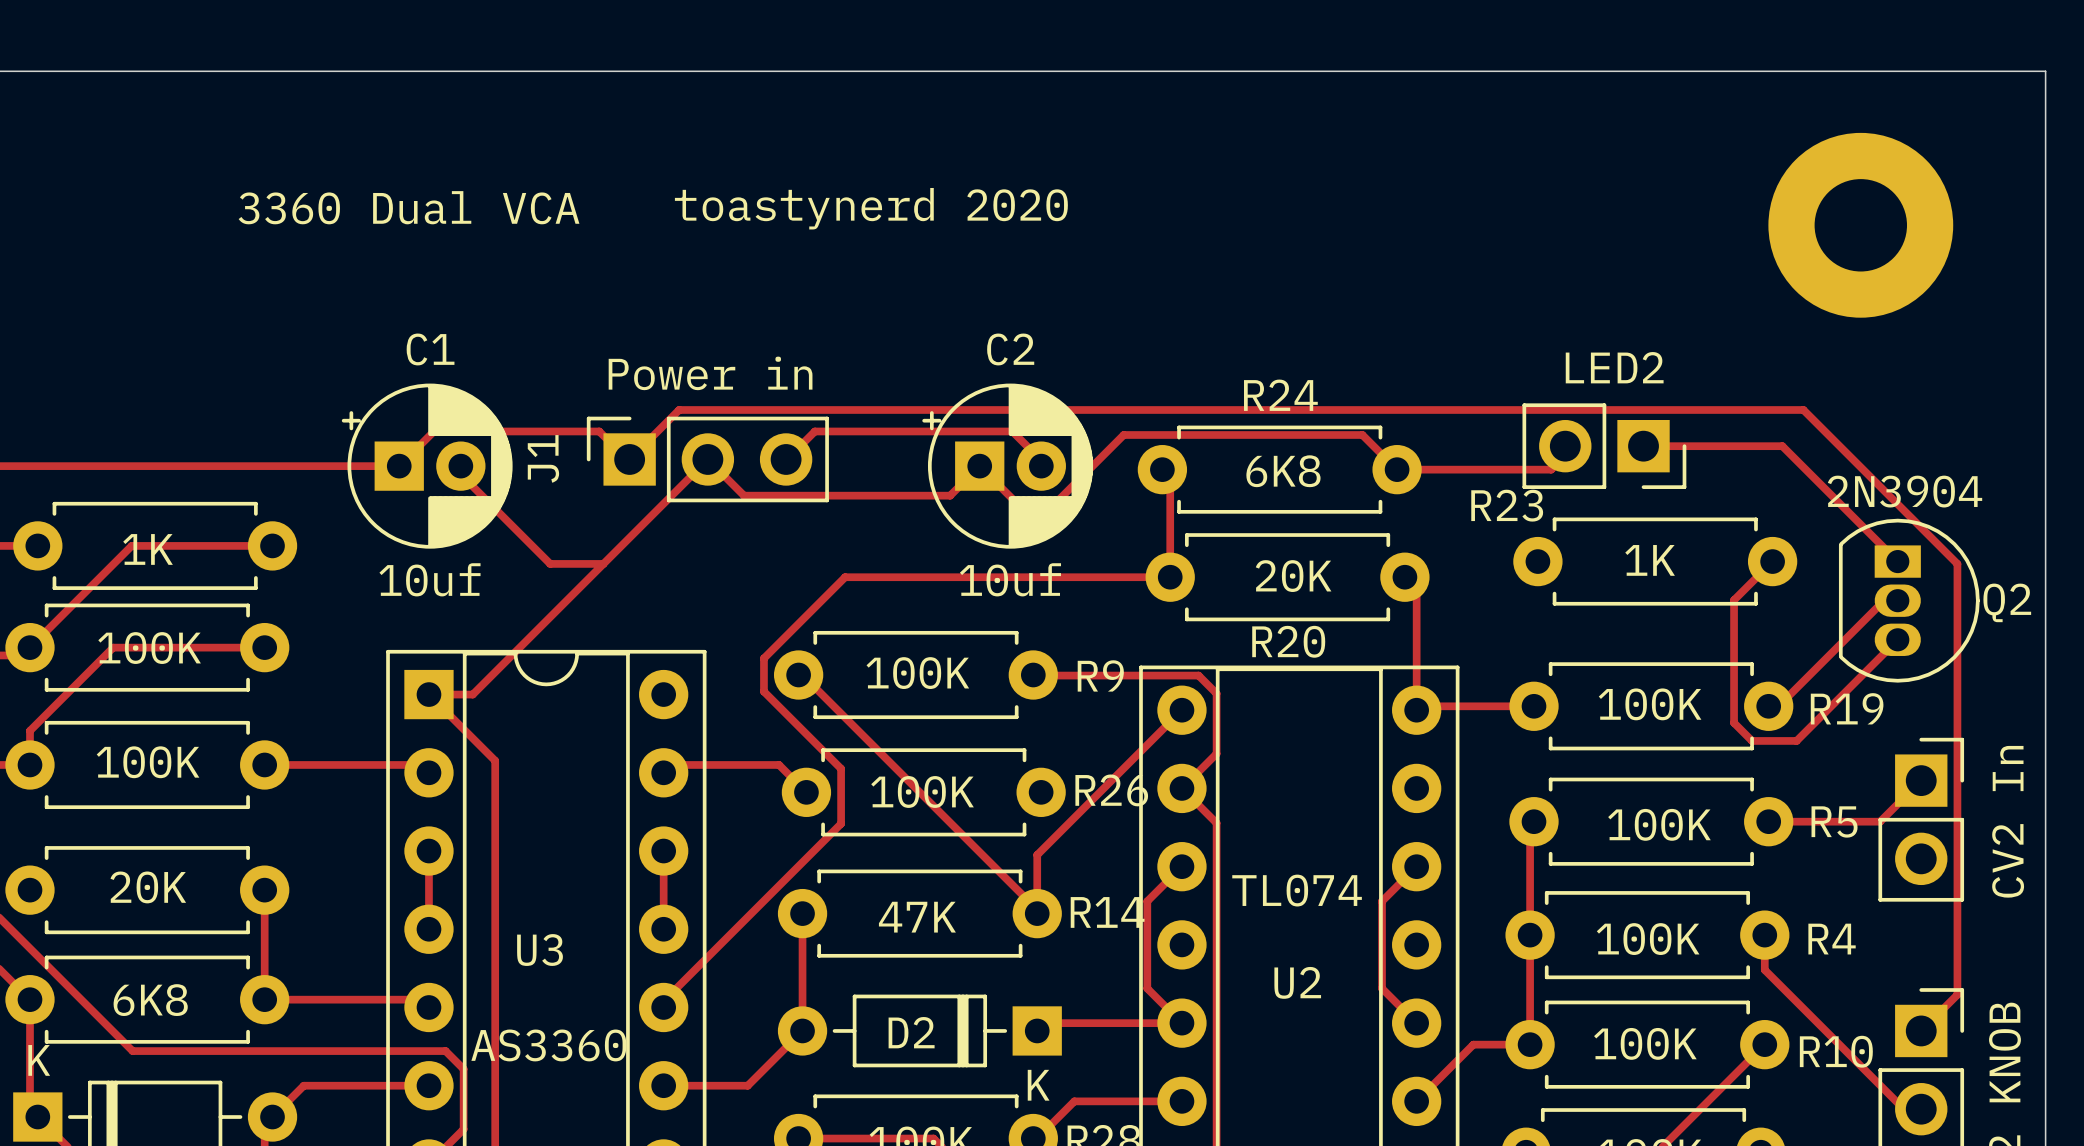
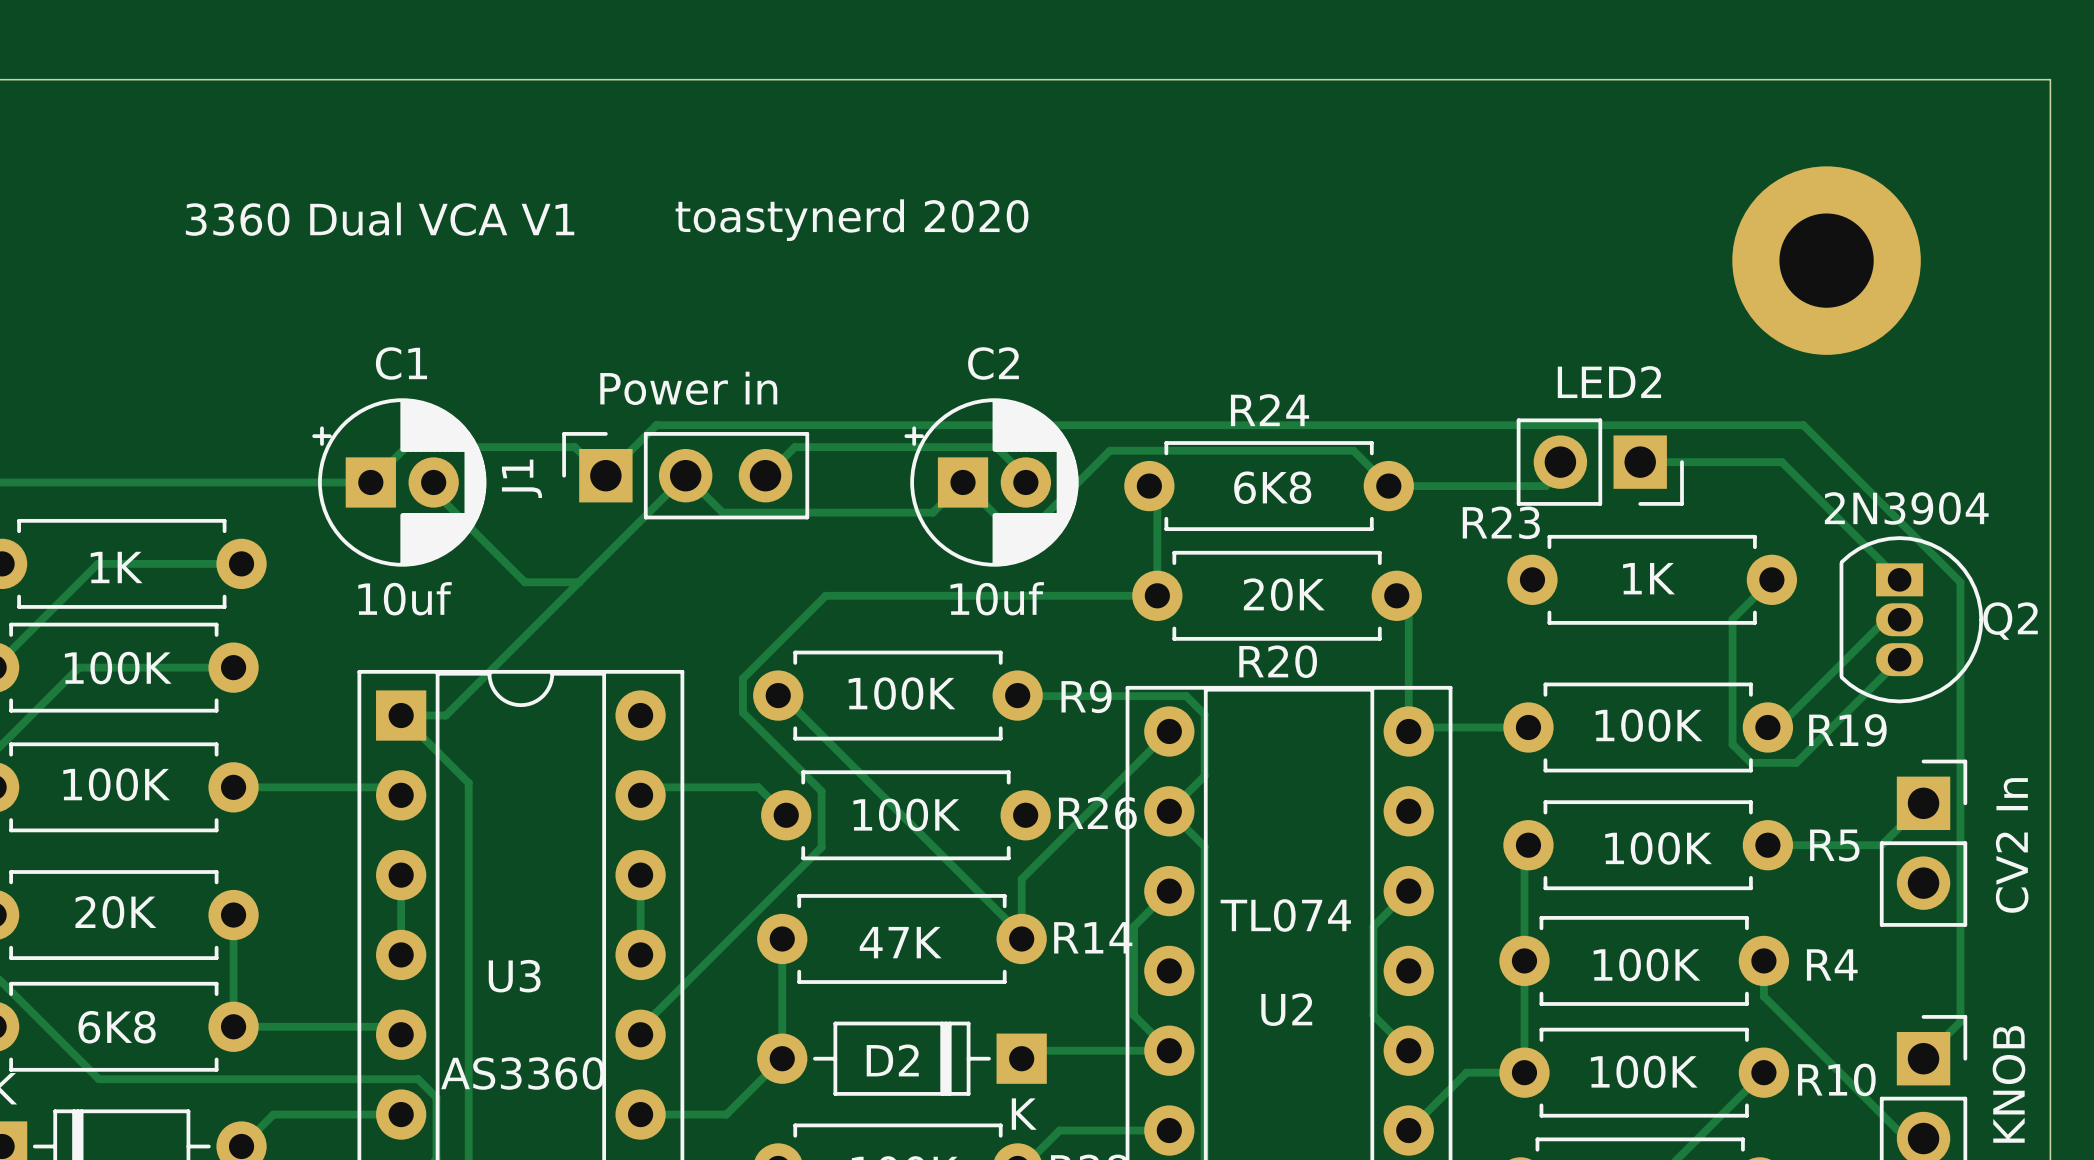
text: 3360 Dual VCA (409, 207) -> 3360 Dual VCA V1 (380, 219)
part position: (1860, 225) -> (1826, 260)

